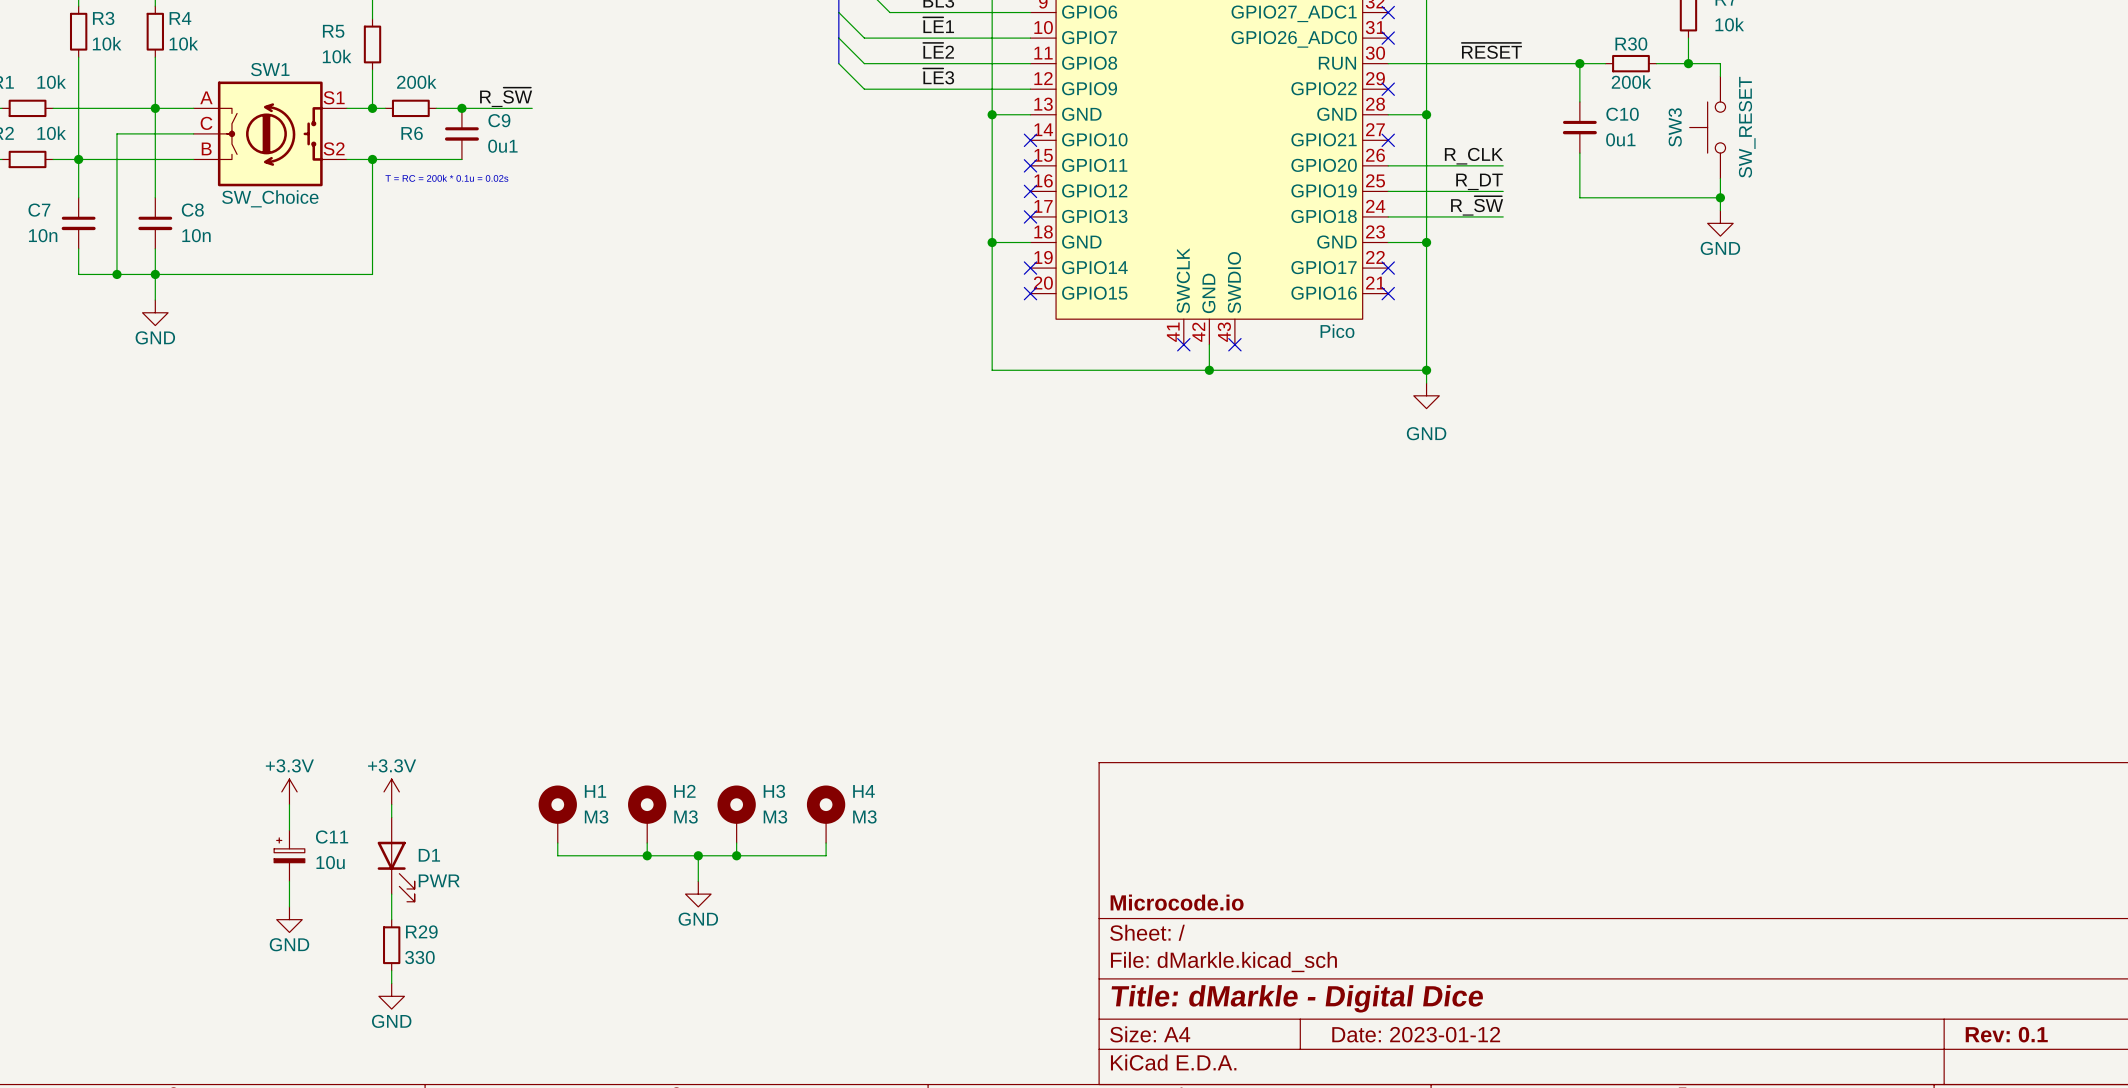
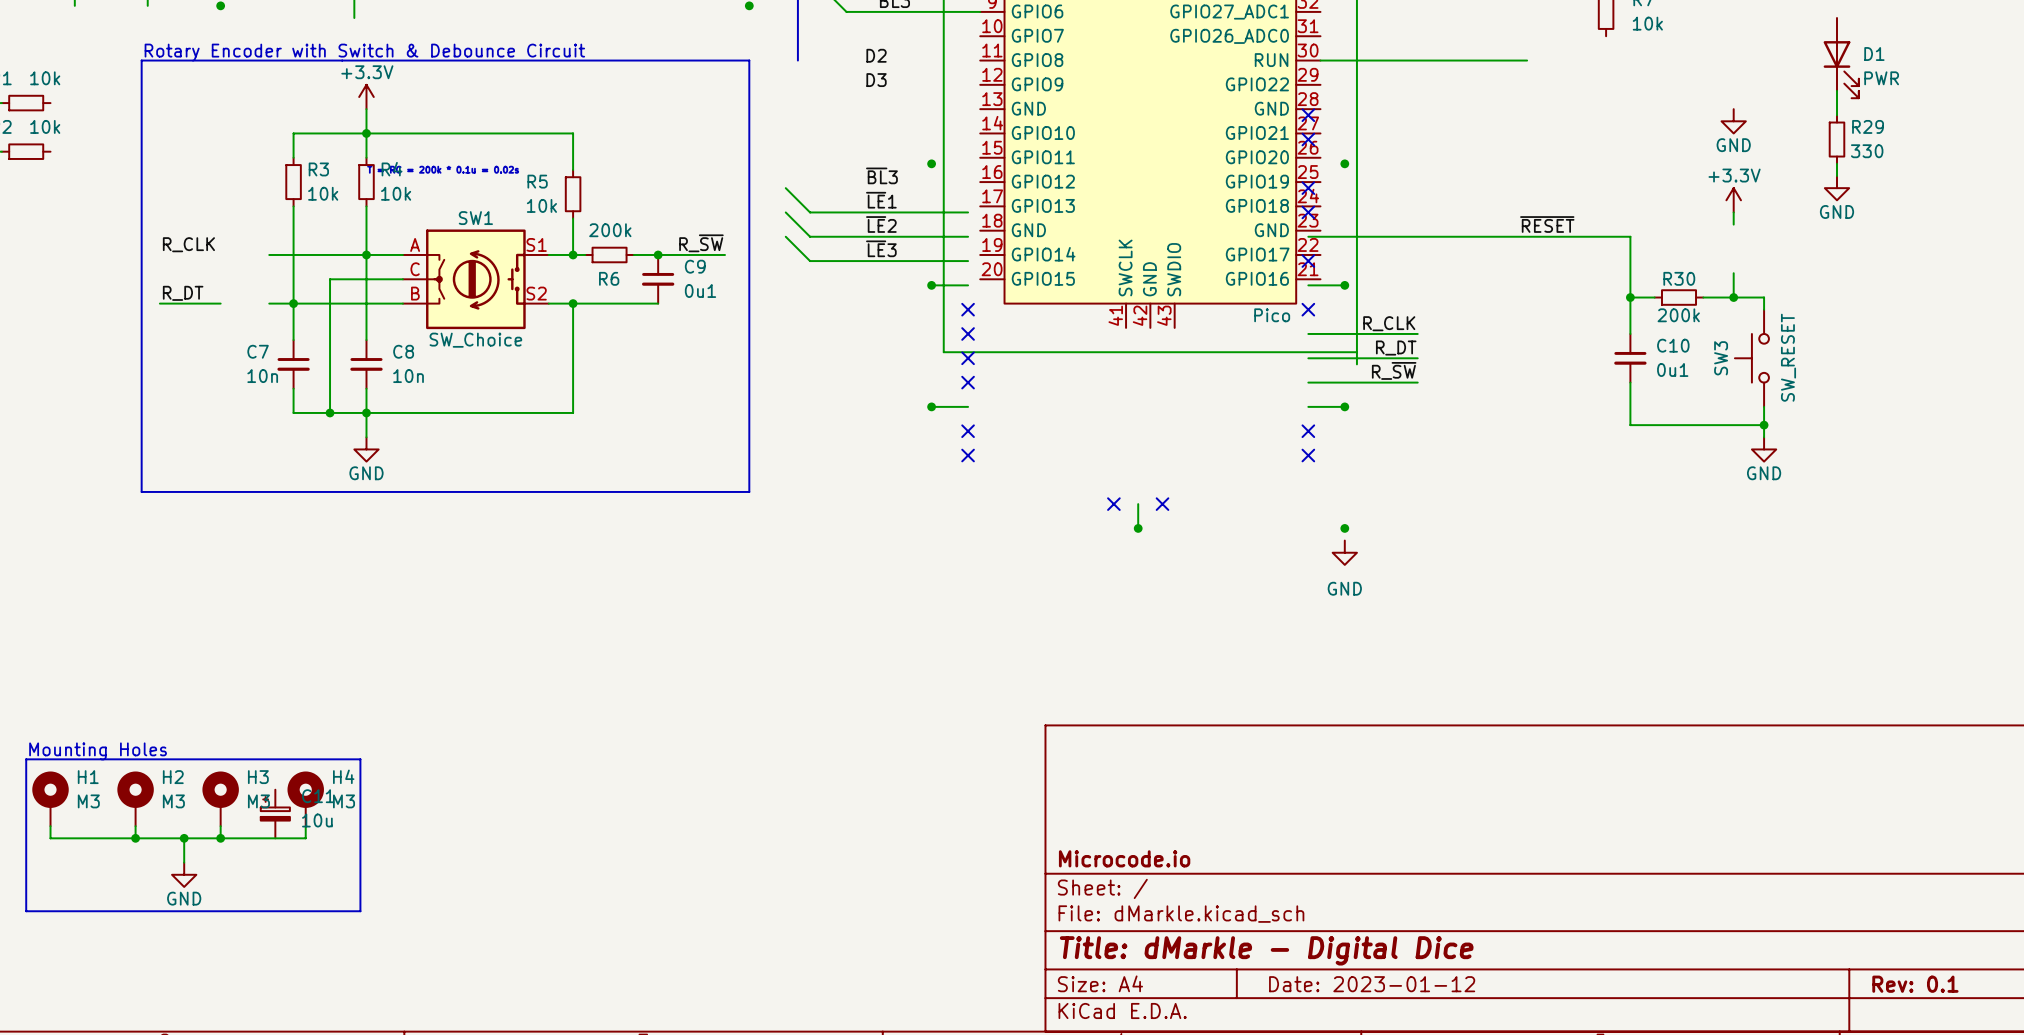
junction: none -> (220, 5)
junction: none -> (749, 5)
wire: (838, 12) (864, 38) (1030, 38) -> none
no-connect mark: (1388, 12) -> none
label position: ~{LE}1 (938, 25) -> ~{LE}1 (881, 200)
R3 position: (78, 31) -> (293, 182)
R4 position: (155, 31) -> (366, 182)
wire: (838, 38) (864, 63) (1030, 63) -> (785, 212) (810, 236) (968, 236)
no-connect mark: (1388, 38) -> none
wire: (1688, 38) (1688, 63) -> (1837, 90) (1837, 115)
R5 position: (372, 44) -> (573, 194)
label position: ~{LE}2 (938, 50) -> ~{LE}2 (881, 224)
label position: ~{RESET} (1491, 50) -> ~{RESET} (1547, 224)
text: none -> Rotary Encoder with Switch & Debounce Circuit (364, 52)
wire: (78, 57) (78, 197) -> none
wire: (155, 57) (155, 197) -> (293, 206) (293, 340)
label: none -> D2 (876, 55)
line: none -> (141, 60) (141, 491) (749, 491) (749, 60) (141, 60)
wire: (838, 63) (864, 89) (1030, 89) -> none
wire: (1579, 63) (1579, 101) -> none
junction: (1579, 63) -> none
R30 position: (1630, 63) -> (1679, 297)
wire: (1656, 63) (1720, 63) (1720, 76) -> none
junction: (1688, 63) -> none
wire: (372, 70) (372, 108) -> none
label: ~{LE}3 (938, 76) -> none
label: none -> D3 (876, 80)
no-connect mark: (1388, 89) -> none
label: R_~{SW} (506, 97) -> none
power symbol: none -> +3.3V (366, 97)
wire: (53, 108) (193, 108) -> none
junction: (155, 108) -> none
wire: (346, 108) (385, 108) -> none
junction: (372, 108) -> none
R6 position: (410, 108) -> (609, 254)
wire: (436, 108) (532, 108) -> none
junction: (461, 108) -> none
wire: none -> (366, 109) (366, 157)
wire: (992, 114) (1030, 114) -> (931, 285) (968, 285)
junction: (992, 114) -> none
wire: (1388, 114) (1426, 114) -> (1308, 285) (1344, 285)
junction: (1426, 114) -> none
no-connect mark: none -> (1308, 115)
C10 position: (1579, 127) -> (1630, 358)
SW3 position: (1707, 127) -> (1751, 358)
power symbol: none -> GND (1733, 121)
wire: (193, 133) (116, 133) (116, 274) -> none
SW1 position: (270, 133) -> (475, 279)
C9 position: (461, 133) -> (658, 279)
junction: none -> (366, 133)
no-connect mark: (1030, 140) -> none
no-connect mark: (1388, 140) -> none
no-connect mark: none -> (1308, 139)
wire: (1579, 153) (1579, 197) (1720, 197) -> none
label position: R_CLK (1473, 156) -> R_CLK (1389, 323)
wire: (53, 159) (193, 159) -> none
junction: (78, 159) -> none
wire: (346, 159) (461, 159) -> none
wire: (372, 159) (372, 274) (78, 274) (78, 248) -> none
junction: (372, 159) -> none
wire: none -> (293, 157) (293, 133) (573, 133) (573, 169)
no-connect mark: (1030, 165) -> none
wire: (1388, 165) (1503, 165) -> (1308, 333) (1417, 333)
junction: none -> (931, 163)
junction: none -> (1344, 163)
wire: none -> (1837, 163) (1837, 175)
wire: (1720, 178) (1720, 210) -> none
label position: R_DT (1479, 181) -> R_DT (1396, 348)
label: none -> ~{BL}3 (881, 175)
no-connect mark: (1030, 191) -> none
wire: (1388, 191) (1503, 191) -> (1308, 358) (1417, 358)
wire: none -> (785, 188) (810, 212)
no-connect mark: none -> (1308, 188)
junction: (1720, 197) -> none
power symbol: none -> GND (1837, 188)
label position: R_~{SW} (1477, 205) -> R_~{SW} (1394, 370)
power symbol: none -> +3.3V (1733, 200)
wire: none -> (366, 206) (366, 340)
no-connect mark: (1030, 216) -> none
wire: (1388, 216) (1503, 216) -> (1308, 382) (1417, 382)
C7 position: (78, 223) -> (293, 364)
C8 position: (155, 223) -> (366, 364)
wire: none -> (810, 212) (968, 212)
no-connect mark: none -> (1308, 212)
power symbol: GND (1720, 223) -> none
wire: none -> (1733, 212) (1733, 224)
wire: none -> (573, 218) (573, 254)
wire: (992, 242) (1030, 242) -> (931, 406) (968, 406)
junction: (992, 242) -> none
wire: (1388, 242) (1426, 242) -> (1308, 406) (1344, 406)
junction: (1426, 242) -> none
wire: (155, 248) (155, 300) -> none
wire: none -> (785, 236) (810, 261)
wire: none -> (1308, 236) (1630, 236) (1630, 333)
label: none -> R_~{SW} (701, 243)
label: none -> R_CLK (188, 244)
label: none -> ~{LE}3 (881, 248)
wire: none -> (269, 254) (402, 254)
junction: none -> (366, 254)
wire: none -> (548, 254) (585, 254)
junction: none -> (573, 254)
wire: none -> (633, 254) (725, 254)
junction: none -> (658, 254)
no-connect mark: (1030, 268) -> none
no-connect mark: (1388, 268) -> none
junction: (116, 274) -> none
junction: (155, 274) -> none
wire: none -> (810, 261) (968, 261)
no-connect mark: none -> (1308, 261)
wire: none -> (1733, 273) (1733, 297)
wire: none -> (402, 279) (330, 279) (330, 412)
no-connect mark: (1030, 293) -> none
no-connect mark: (1388, 293) -> none
junction: none -> (931, 285)
junction: none -> (1344, 285)
label: none -> R_DT (183, 293)
power symbol: GND (155, 312) -> none
wire: none -> (1630, 297) (1654, 297)
junction: none -> (1630, 297)
wire: none -> (1703, 297) (1764, 297) (1764, 309)
junction: none -> (1733, 297)
wire: none -> (159, 303) (220, 303)
wire: none -> (269, 303) (402, 303)
junction: none -> (293, 303)
wire: none -> (548, 303) (658, 303)
wire: none -> (573, 303) (573, 412) (293, 412) (293, 388)
junction: none -> (573, 303)
no-connect mark: none -> (968, 309)
no-connect mark: none -> (1308, 309)
no-connect mark: (1183, 344) -> none
wire: (1209, 344) (1209, 370) -> (1138, 504) (1138, 528)
no-connect mark: (1234, 344) -> none
no-connect mark: none -> (968, 333)
junction: (1209, 370) -> none
junction: (1426, 370) -> none
no-connect mark: none -> (968, 358)
power symbol position: GND (1426, 395) -> GND (1344, 552)
no-connect mark: none -> (968, 382)
wire: none -> (1630, 382) (1630, 425) (1764, 425)
wire: none -> (366, 388) (366, 437)
junction: none -> (931, 406)
junction: none -> (1344, 406)
wire: none -> (1764, 406) (1764, 437)
junction: none -> (330, 412)
junction: none -> (366, 412)
junction: none -> (1764, 425)
no-connect mark: none -> (968, 431)
no-connect mark: none -> (1308, 431)
power symbol: none -> GND (366, 449)
power symbol: none -> GND (1764, 449)
no-connect mark: none -> (968, 455)
no-connect mark: none -> (1308, 455)
no-connect mark: none -> (1113, 504)
no-connect mark: none -> (1162, 504)
junction: none -> (1138, 528)
junction: none -> (1344, 528)
text: none -> Mounting Holes (98, 751)
power symbol: +3.3V (289, 791) -> none
power symbol: +3.3V (391, 791) -> none
line: none -> (26, 759) (26, 911) (360, 911) (360, 759) (26, 759)
wire: (289, 804) (289, 830) -> none
wire: (391, 804) (391, 817) -> (220, 826) (220, 838)
H1 position: (557, 814) -> (50, 798)
H2 position: (647, 814) -> (135, 798)
H3 position: (736, 814) -> (220, 798)
H4 position: (826, 814) -> (305, 798)
wire: (557, 843) (557, 855) (826, 855) (826, 843) -> none
wire: (647, 843) (647, 855) -> none
wire: (736, 843) (736, 855) -> none
junction: (647, 855) -> none
wire: (698, 855) (698, 881) -> none
junction: (698, 855) -> none
junction: (736, 855) -> none
D1 position: (396, 859) -> (1841, 58)
wire: none -> (50, 826) (50, 838) (305, 838) (305, 826)
wire: none -> (135, 826) (135, 838)
junction: none -> (135, 838)
junction: none -> (184, 838)
junction: none -> (220, 838)
wire: (289, 881) (289, 906) -> (184, 838) (184, 862)
wire: (391, 894) (391, 919) -> none
power symbol: GND (698, 894) -> none
power symbol position: GND (289, 919) -> GND (184, 874)
R29 position: (391, 945) -> (1837, 139)
wire: (391, 970) (391, 983) -> none
power symbol: GND (391, 996) -> none

